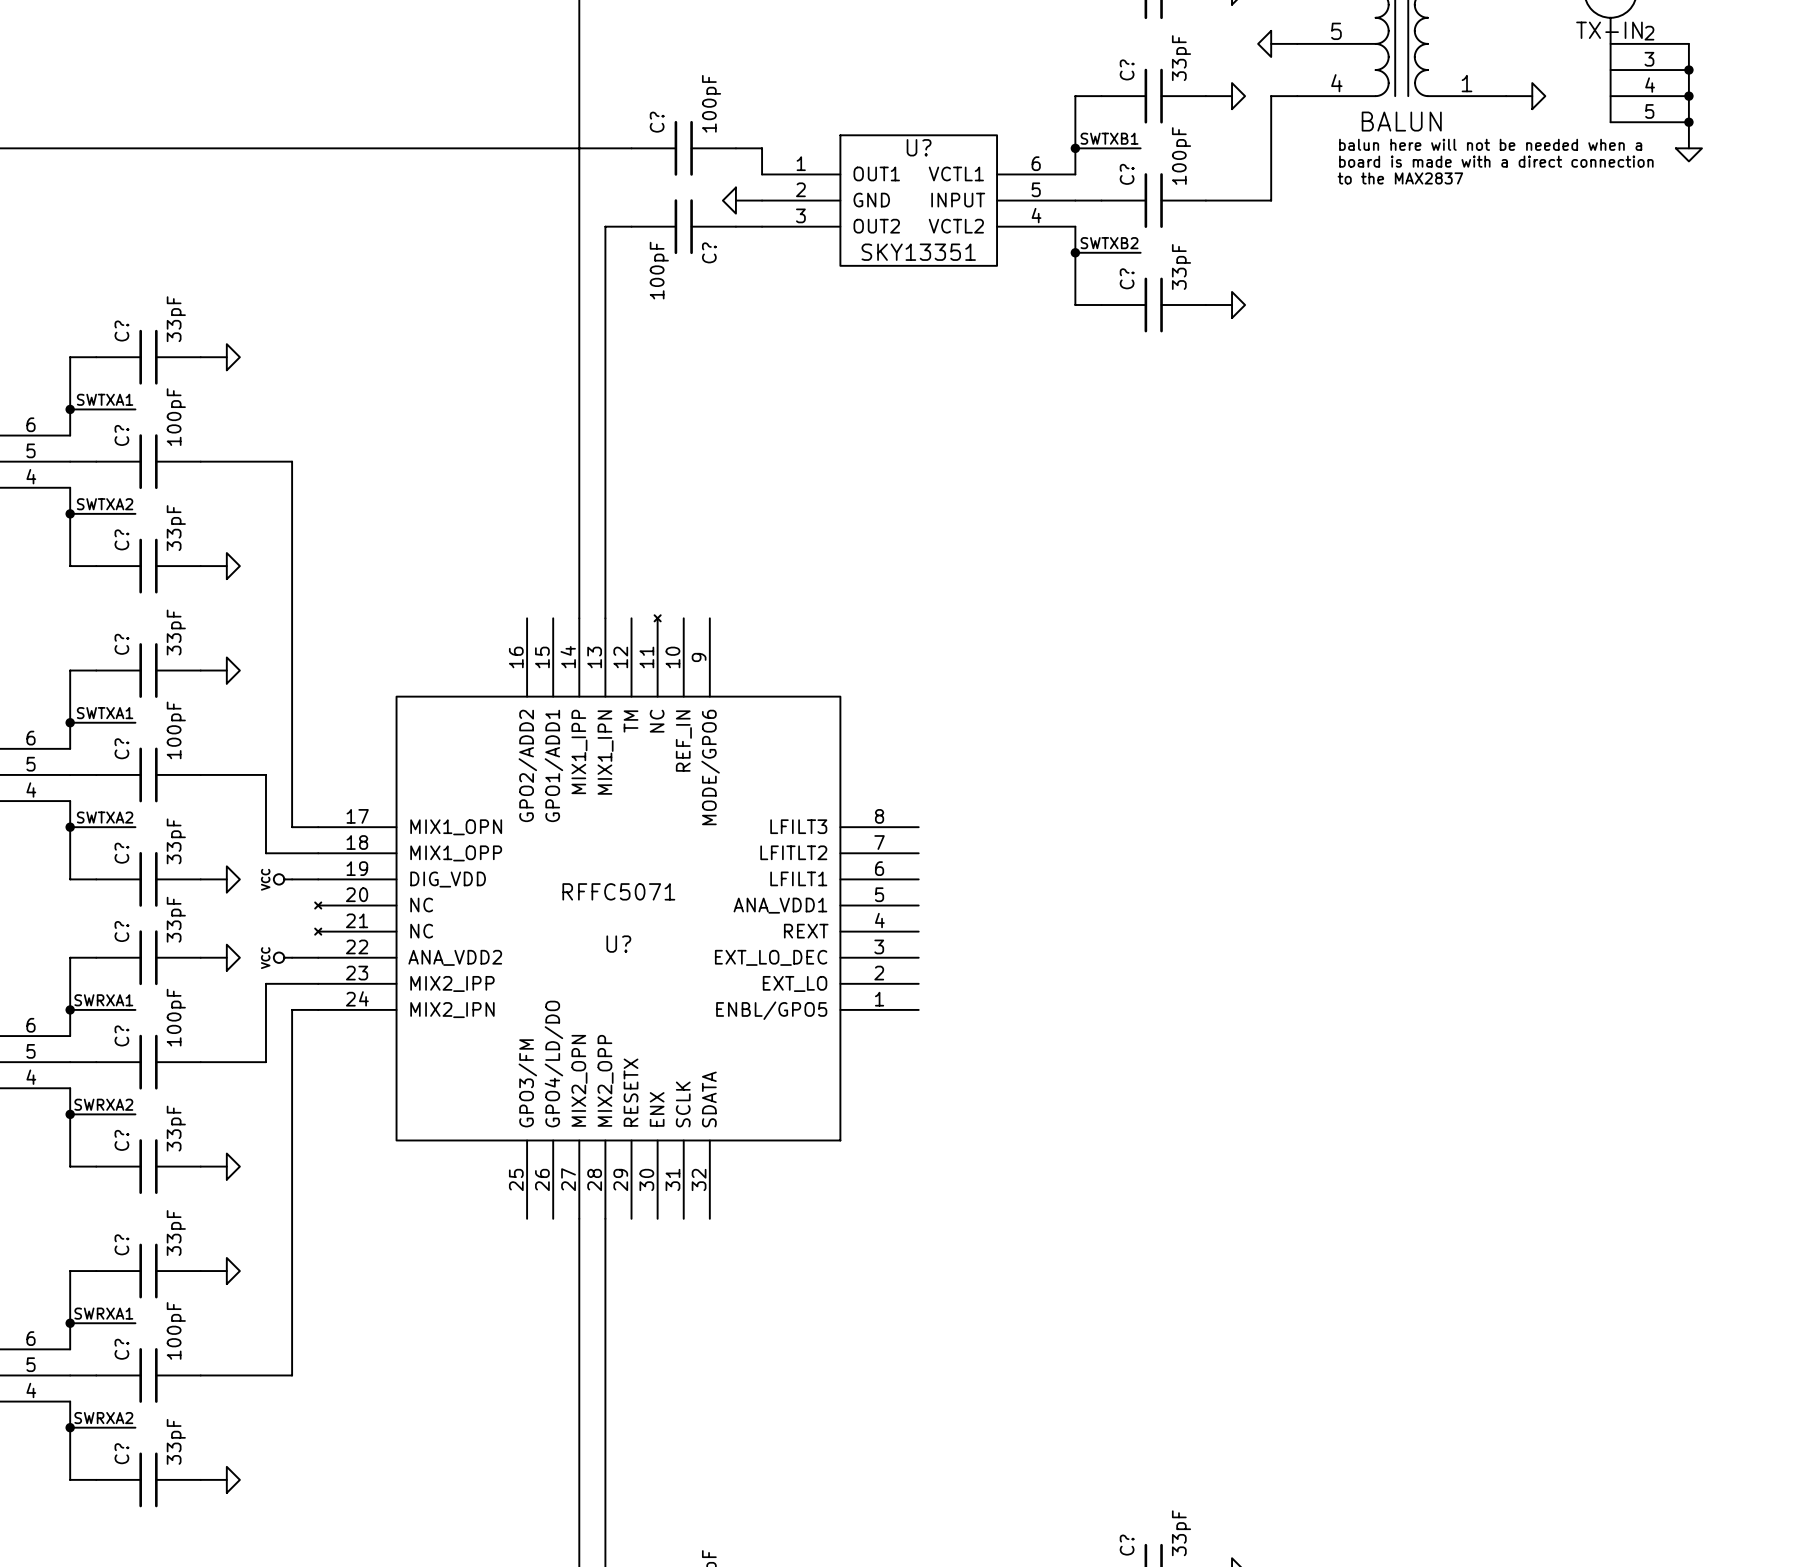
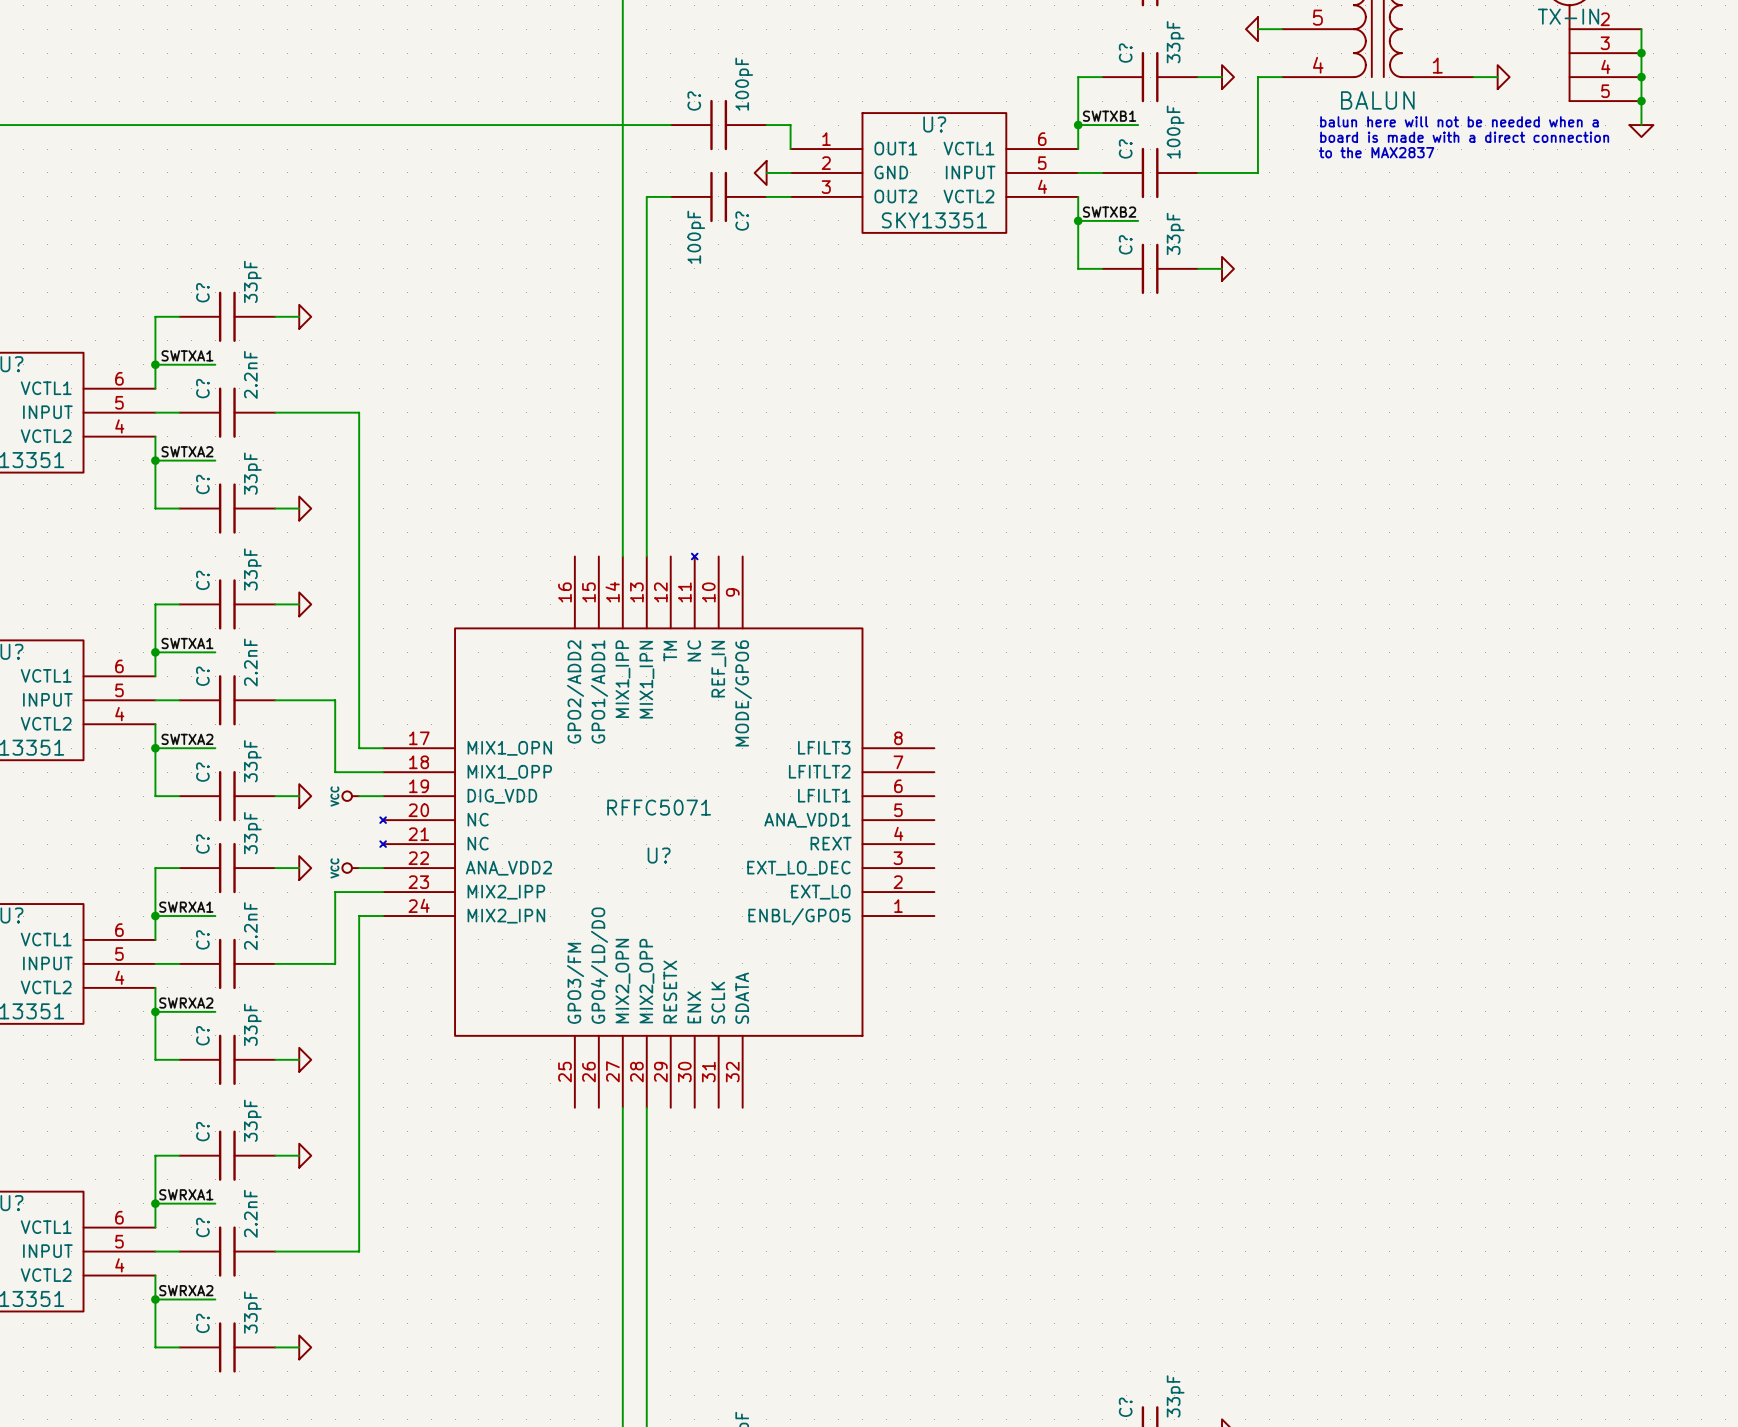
C? value: 100pF (176, 417) -> 2.2nF (250, 374)
C? value: 100pF (176, 730) -> 2.2nF (250, 662)
C? value: 100pF (176, 1017) -> 2.2nF (250, 926)
C? value: 100pF (176, 1330) -> 2.2nF (250, 1213)

